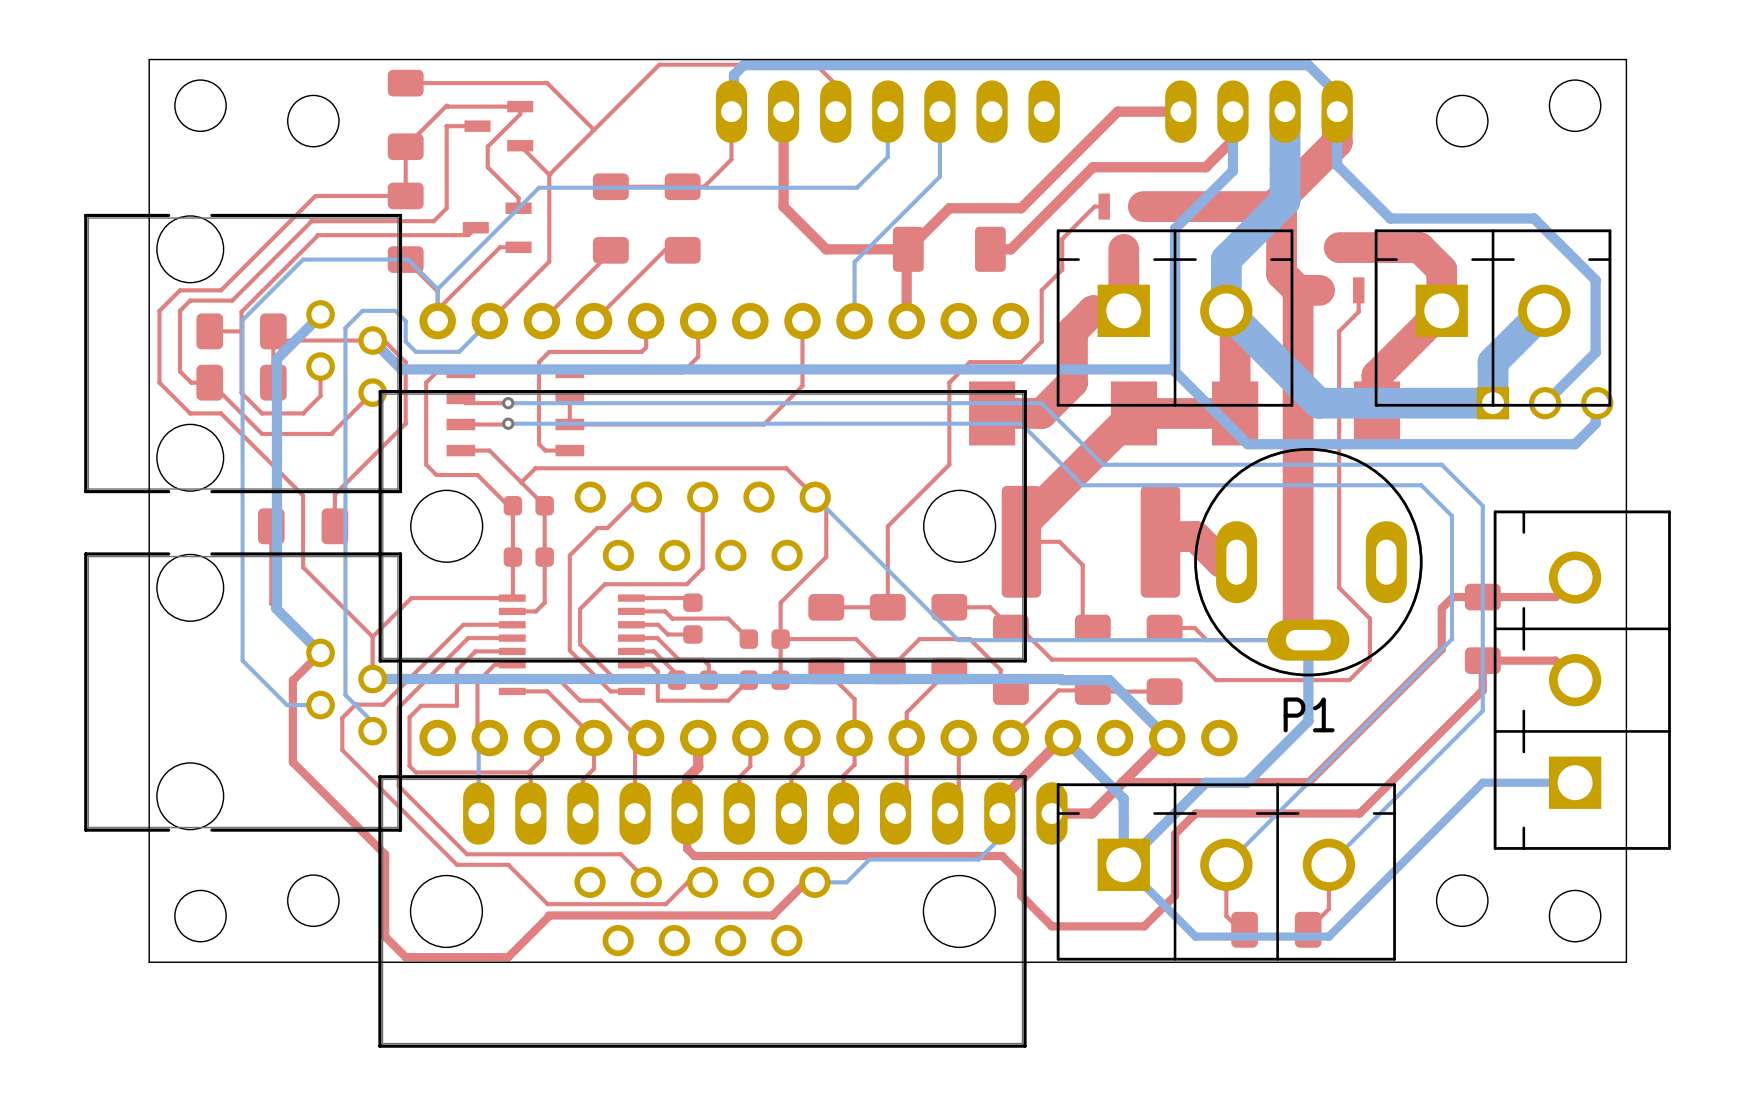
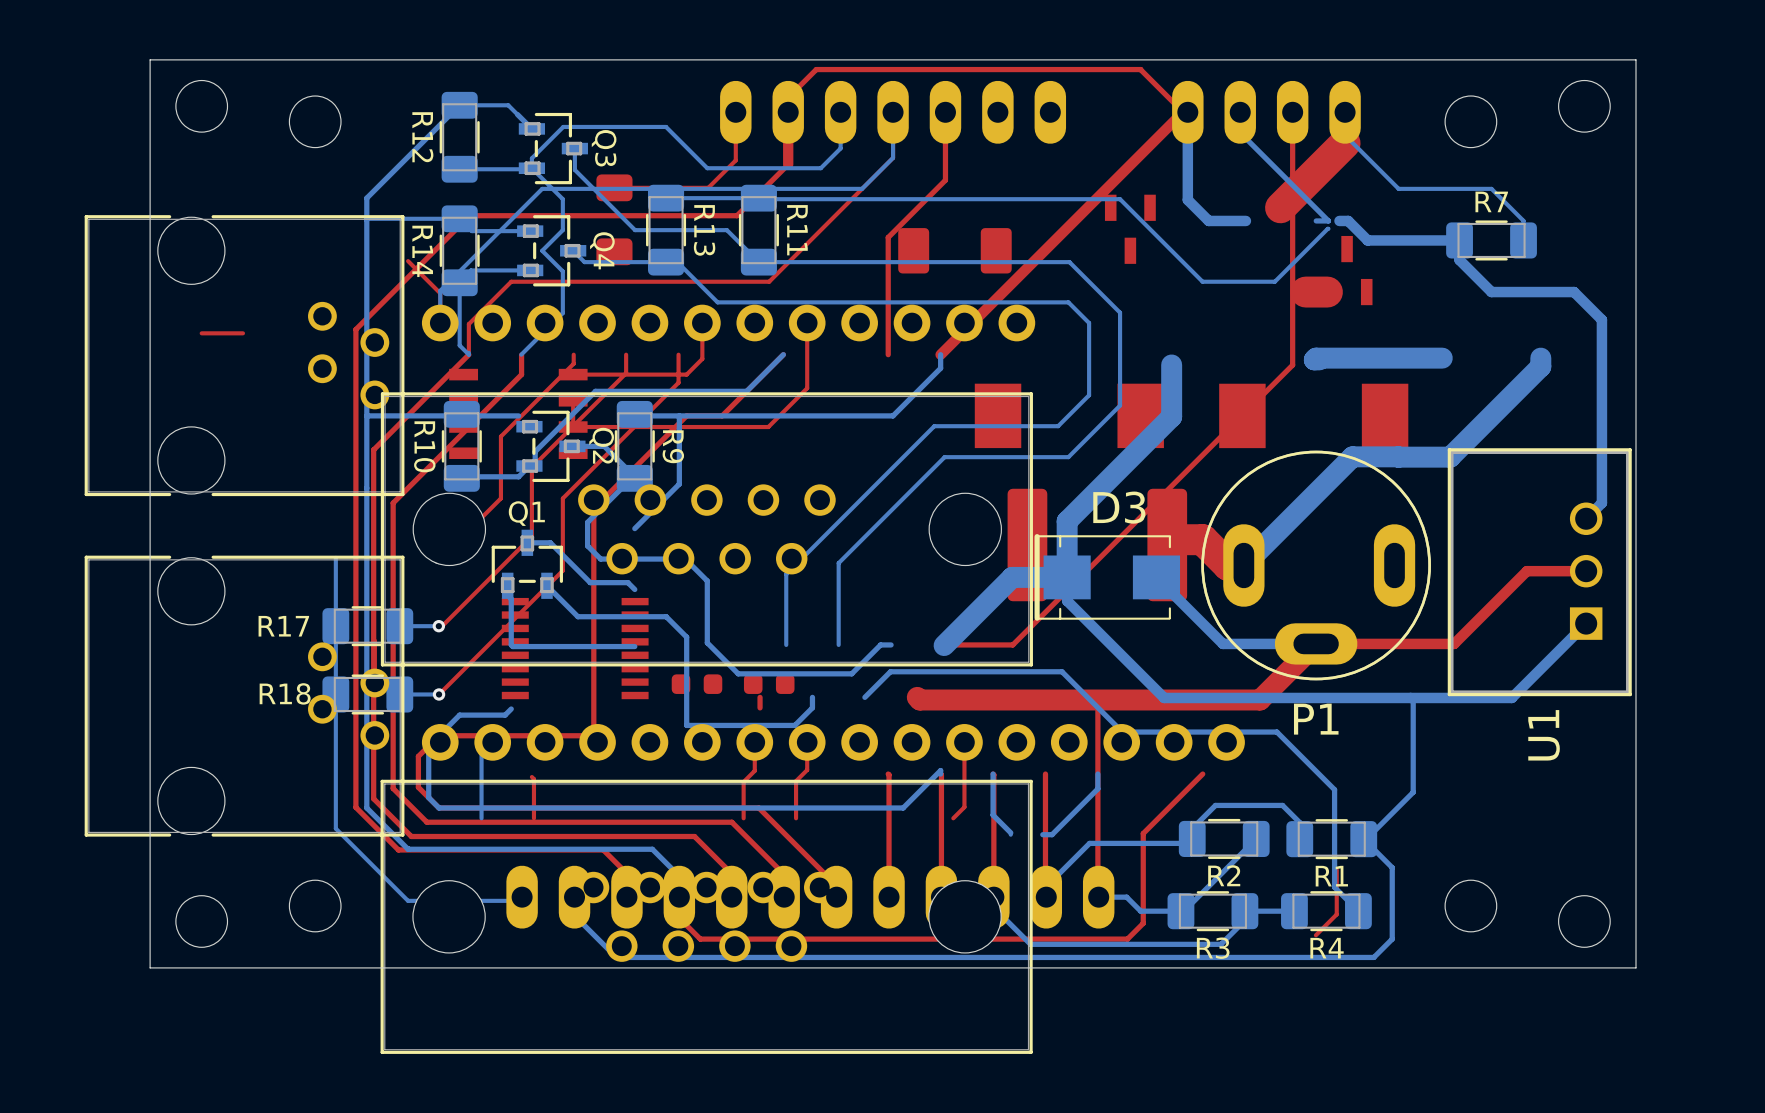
top track: none -> (1140, 69) (816, 69) (788, 97) (788, 112)
top track: none -> (1140, 69) (1183, 112)
top track: (403, 85) (405, 83) (547, 83) (594, 129) -> none
top track: (835, 111) (835, 84) (816, 64) (659, 64) (549, 174) -> none
bottom track: none -> (840, 112) (840, 148) (820, 168) (707, 168) (666, 126) (563, 126) (531, 158) (531, 168)
top track: none -> (893, 112) (893, 157) (769, 281) (511, 281) (468, 324) (468, 354) (373, 449) (373, 798) (411, 836) (694, 836) (731, 873)
top track: none -> (945, 112) (945, 180) (888, 237) (888, 354)
bottom track: (939, 111) (939, 176) (854, 262) (854, 321) -> none
top track: (1176, 111) (1117, 111) (1021, 208) (949, 208) (906, 250) (906, 321) -> (1183, 112) (940, 354)
bottom track: none -> (1187, 112) (1187, 199) (1208, 220) (1245, 220)
top track: (1232, 111) (1232, 140) (1205, 167) (1092, 167) (1010, 249) (990, 249) -> none
top track: none -> (1292, 112) (1292, 365) (1012, 644) (943, 644)
bottom track: (1285, 111) (1285, 200) (1226, 259) (1226, 310) (1318, 403) (1493, 403) (1493, 362) (1544, 310) -> none
bottom track: (1337, 111) (1337, 93) (1308, 65) (743, 65) (733, 74) (733, 109) (731, 111) -> none
R12 side: top (405, 114) -> bottom (459, 137)
top track: (477, 126) (446, 126) (446, 208) (433, 221) (310, 221) -> none
Q3 side: top (498, 126) -> bottom (553, 148)
bottom track: none -> (531, 128) (508, 105) (459, 105) (366, 198) (366, 807) (408, 849) (652, 849) (679, 876) (679, 897)
bottom track: (1232, 131) (1232, 170) (1175, 228) (1175, 371) (1247, 444) (1575, 444) (1595, 423) (1595, 404) (1597, 403) -> (1240, 132) (1328, 220) (1316, 220)
bottom track: (1337, 134) (1337, 165) (1390, 218) (1534, 218) (1595, 280) (1595, 352) (1545, 403) -> (1345, 135) (1398, 188) (1491, 188) (1523, 220) (1523, 240)
top track: (520, 145) (549, 174) -> none
bottom track: none -> (574, 148) (574, 169) (635, 230) (726, 230) (758, 262) (1069, 262) (1120, 312) (1120, 405) (1068, 457) (944, 457) (838, 563) (838, 644)
top track: (783, 163) (783, 206) (826, 249) (908, 249) -> (788, 164) (737, 215) (469, 215) (355, 329) (355, 807) (398, 849) (603, 849) (626, 873) (626, 897)
bottom track: none -> (531, 168) (562, 199) (562, 230) (542, 250) (562, 271) (562, 313) (521, 354)
bottom track: none -> (531, 168) (459, 169)
top track: (549, 174) (549, 261) (489, 321) -> none
bottom track: none -> (666, 198) (1120, 199) (1202, 281) (1274, 281) (1328, 228)
top track: (1104, 206) (1094, 206) (1062, 239) (1062, 269) (1041, 290) (1041, 341) (1021, 362) (969, 362) (949, 382) (949, 464) (887, 526) (887, 607) (826, 607) -> none
top track: (1143, 206) (1273, 206) (1281, 215) (1281, 273) (1298, 290) (1298, 629) (1308, 640) (1206, 640) (1194, 628) (1164, 628) -> none
top track: (518, 208) (518, 198) (487, 167) (487, 146) (520, 114) (520, 106) (446, 105) (405, 146) (405, 195) (315, 195) (221, 290) (180, 290) (159, 310) (159, 382) (190, 413) (221, 413) (303, 495) (303, 567) (372, 636) (411, 598) (512, 597) (512, 505) (508, 505) (477, 474) (436, 474) (426, 464) (426, 382) (436, 372) (460, 372) -> none
bottom track: none -> (366, 219) (459, 218) (472, 231) (530, 231)
part: (682, 218) -> none
bottom track: none -> (1339, 220) (1348, 220) (1367, 240) (1459, 240) (1459, 260) (1491, 292) (1574, 292) (1601, 319) (1601, 503) (1586, 518)
top track: (311, 221) (232, 300) (190, 300) (180, 310) (180, 371) (191, 382) (210, 382) (262, 433) (332, 433) -> none
R14 side: top (405, 227) -> bottom (459, 250)
top track: (475, 227) (468, 235) (317, 235) -> none
Q4 side: top (497, 227) -> bottom (551, 250)
R11: none -> (758, 230)
top track: (318, 235) (241, 311) (241, 392) (262, 413) (304, 413) -> none
R7: none -> (1491, 240)
top track: (518, 247) (500, 247) (437, 309) -> none
top track: (1339, 247) (1419, 247) (1441, 269) (1441, 310) (1376, 375) (1376, 413) -> none
top track: (1123, 249) (1123, 310) (1092, 310) (1072, 331) (1072, 382) (1041, 413) (992, 413) -> none
top track: (610, 250) (541, 321) -> none
top track: (682, 250) (664, 250) (594, 321) -> none
bottom track: none -> (530, 270) (470, 270) (459, 281) (459, 345) (468, 354) (468, 352)
bottom track: (437, 289) (408, 259) (303, 259) (242, 320) (242, 660) (286, 705) (320, 705) -> none
top track: (1358, 290) (1358, 311) (1339, 331) (1339, 587) (1369, 618) (1369, 659) (1349, 680) (1216, 680) (1195, 659) (1051, 659) (1020, 628) (1010, 628) (990, 607) (949, 607) -> none
top track: (1226, 310) (1235, 319) (1235, 413) (1134, 413) (1021, 526) (1021, 541) (1059, 541) (1082, 565) (1082, 617) (1092, 628) -> none
bottom track: (321, 314) (276, 359) (276, 608) -> none
part: (1175, 318) -> none
part: (1493, 318) -> none
bottom track: (489, 321) (459, 351) (415, 351) (405, 341) (405, 321) (395, 310) (362, 310) (345, 327) (345, 694) (372, 722) (372, 731) -> none
top track: (646, 321) (646, 347) (641, 351) (549, 351) (539, 362) (539, 444) (545, 450) (569, 450) -> none
R13 side: top (241, 331) -> bottom (666, 230)
bottom track: (372, 340) (401, 369) (1175, 369) -> none
top track: none -> (521, 354) (521, 374) (393, 503) (393, 788) (426, 822) (731, 822) (784, 874)
top track: none -> (573, 354) (573, 363) (511, 426)
top track: none -> (626, 354) (626, 373) (531, 467) (531, 536) (441, 627) (438, 627)
top track: none -> (783, 354) (722, 415) (686, 415) (593, 508) (593, 735) (439, 735) (418, 756) (418, 787) (439, 807) (758, 807) (836, 885) (836, 897)
bottom track: none -> (783, 354) (746, 391) (595, 391) (535, 451) (535, 460) (518, 476) (461, 478)
bottom track: none -> (940, 354) (940, 368) (893, 415) (634, 415)
bottom track: none -> (1442, 358) (1316, 358) (1314, 359) (1319, 359)
bottom track: none -> (1540, 358) (1540, 366) (1450, 457) (1352, 456) (1243, 565)
bottom track: none -> (1171, 364) (1171, 416) (1067, 521) (1067, 577)
top track: (320, 366) (320, 396) (303, 413) -> none
part: (241, 382) -> none
top track: (273, 382) (273, 331) (282, 340) (384, 340) (405, 362) (405, 423) (334, 494) (334, 526) -> none
top track: (372, 392) (331, 433) -> none
top track: (460, 398) (465, 403) (508, 403) -> none
bottom track: (508, 403) (1041, 403) (1103, 464) (1441, 464) (1482, 505) (1482, 710) (1328, 864) -> none
via: (508, 403) -> none
part side: top (1545, 403) -> bottom (1539, 572)
bottom track: none -> (518, 415) (366, 415)
bottom track: none -> (679, 415) (679, 484) (634, 528)
via: (508, 423) -> none
bottom track: (928, 423) (508, 423) -> (934, 426) (786, 574) (786, 644)
bottom track: (1021, 423) (1082, 485) (1421, 485) (1452, 516) (1452, 639) (1226, 864) -> (1027, 426) (1058, 426) (1089, 395) (1089, 323) (1068, 302) (717, 302) (677, 262) (584, 262) (573, 250)
top track: (507, 424) (460, 424) -> (510, 427) (500, 436) (500, 498) (441, 557) (438, 557)
R10: none -> (461, 446)
Q2: none -> (550, 446)
bottom track: none -> (572, 446) (604, 446) (634, 476) (587, 522) (587, 545) (600, 559) (685, 559) (707, 580) (707, 642) (738, 673) (851, 673) (880, 644) (891, 644)
R9: none -> (634, 446)
top track: (460, 450) (489, 450) (544, 505) (544, 602) (535, 611) (512, 611) -> none
top track: (521, 482) (535, 468) (786, 468) (826, 508) (826, 557) (780, 602) (780, 680) -> none
top track: (646, 497) (638, 497) (607, 528) (597, 528) (569, 555) (569, 650) (610, 691) (631, 691) -> none
top track: (702, 497) (702, 568) (686, 584) (604, 584) (580, 609) (580, 644) (613, 678) (631, 678) -> none
bottom track: (815, 497) (958, 640) (1215, 640) -> (1156, 577) (1222, 643)
part: (528, 505) -> none
top track: (271, 526) (271, 603) (320, 652) (292, 680) (292, 762) (385, 854) (385, 936) (405, 957) (508, 957) (548, 915) (772, 915) (806, 882) (814, 882) -> none
part: (303, 526) -> none
bottom track: none -> (527, 542) (550, 542) (590, 582) (627, 582) (634, 589)
bottom track: none -> (335, 557) (335, 828) (408, 900) (518, 900) (522, 897)
part: (528, 557) -> none
Q1: none -> (527, 564)
top track: none -> (1586, 571) (1526, 571) (1454, 643) (1316, 643) (1260, 699) (919, 699) (917, 697)
bottom track: none -> (1067, 577) (1067, 600) (1164, 697) (1511, 697) (1586, 623)
bottom track: none -> (1067, 577) (1012, 577) (943, 644)
D3: none -> (1107, 577)
top track: (1575, 577) (1555, 597) (1453, 597) (1441, 608) (1441, 649) (1309, 782) (1123, 782) -> none
bottom track: none -> (507, 585) (507, 595) (511, 599) (512, 646) (634, 646)
bottom track: none -> (546, 585) (577, 616) (666, 616) (686, 637) (686, 725) (794, 725) (812, 707) (812, 697)
top track: (631, 598) (688, 598) (692, 602) -> none
bottom track: (275, 608) (320, 652) -> none
top track: (631, 611) (665, 611) (672, 618) (728, 618) (748, 639) -> none
part: (692, 618) -> none
R17: none -> (367, 626)
bottom track: none -> (438, 626) (399, 626)
via: none -> (438, 626)
top track: (512, 624) (463, 624) (383, 704) (356, 704) (342, 717) (342, 750) (456, 864) (508, 864) (547, 904) (665, 904) (687, 882) (702, 882) -> none
top track: (631, 624) (658, 624) (667, 634) (692, 634) -> none
part: (1482, 628) -> none
top track: (512, 638) (468, 638) (398, 707) (398, 785) (466, 854) (620, 854) (641, 875) (646, 875) -> none
top track: (631, 638) (657, 638) (678, 659) (703, 659) (708, 665) (708, 680) -> none
part: (764, 639) -> none
top track: (780, 639) (856, 639) (887, 670) (919, 639) (969, 639) (1000, 669) (1000, 681) (1010, 691) -> none
part: (826, 639) -> none
part: (887, 639) -> none
part: (949, 639) -> none
bottom track: (1308, 640) (1308, 721) (1246, 782) (1205, 782) (1123, 864) -> none
bottom track width: thin (1308, 640) (1215, 640) -> thick (1316, 643) (1222, 643)
top track: (512, 651) (475, 651) -> (678, 354) (678, 382) (562, 498) (562, 570) (478, 655)
top track: (631, 651) (653, 651) (677, 674) (677, 680) -> none
part: (1010, 659) -> none
R1 side: top (1092, 659) -> bottom (1331, 839)
R2 side: top (1164, 659) -> bottom (1224, 838)
top track: (512, 664) (494, 664) (477, 682) (477, 725) (489, 738) -> none
top track: (631, 664) (650, 664) (657, 671) (657, 700) (728, 700) (748, 680) -> none
top track: (456, 669) (456, 705) (421, 705) (409, 717) (409, 766) (415, 772) (528, 772) (541, 759) (541, 738) -> (459, 673) (439, 694)
top track: (826, 670) (854, 699) (854, 764) (843, 775) (843, 813) -> none
top track: (949, 670) (906, 712) (906, 802) (895, 813) -> none
top track: (512, 678) (557, 678) (580, 700) (600, 700) (637, 738) (646, 738) (635, 749) (635, 813) -> none
bottom track: (372, 679) (1109, 680) (1167, 738) -> none
top track: (1575, 680) (1555, 660) (1482, 660) (1482, 690) (1359, 813) (1195, 813) (1175, 834) (1175, 895) (1144, 926) (1051, 926) (1021, 895) (1021, 875) (1002, 856) (694, 856) (687, 848) (687, 778) (698, 767) (698, 738) -> none
part: (1582, 680) -> none
R18: none -> (367, 694)
bottom track: none -> (439, 694) (399, 694)
via: none -> (439, 694)
top track: (512, 691) (547, 691) (594, 738) (594, 768) (582, 779) (582, 813) -> none
top track: (1164, 691) (1058, 690) (1010, 738) -> none
top track: none -> (760, 697) (760, 707)
bottom track: none -> (864, 697) (890, 671) (1062, 671) (1122, 732) (1276, 732) (1334, 789) (1334, 887) (1358, 911)
bottom track: none -> (1410, 697) (1413, 700) (1413, 792) (1366, 839) (1363, 839) (1392, 867) (1392, 939) (1373, 957) (616, 957) (574, 915) (574, 897)
top track: none -> (1097, 699) (1098, 897)
bottom track: none -> (511, 708) (505, 715) (459, 715) (428, 746) (428, 797) (439, 807) (903, 807) (940, 770) (940, 774)
top track: (1063, 738) (999, 801) (999, 813) -> none
bottom track: (1063, 738) (1123, 798) (1123, 864) -> none
top track: (1167, 738) (1091, 813) (1051, 813) -> none
top track: none -> (888, 774) (889, 897)
top track: none -> (940, 774) (941, 897)
top track: none -> (993, 774) (993, 897)
bottom track: none -> (993, 774) (993, 815) (1010, 834)
top track: none -> (1045, 774) (1046, 897)
bottom track: none -> (1097, 774) (1097, 788) (1052, 834) (1042, 834)
top track: none -> (1202, 774) (1143, 833) (1143, 923) (1127, 939) (700, 939) (679, 918) (679, 897)
bottom track: (1575, 782) (1482, 782) (1328, 936) (1195, 936) (1123, 864) -> none
part position: (765, 813) -> (810, 897)
bottom track: (999, 813) (999, 838) (978, 859) (869, 859) (846, 882) (814, 882) -> none
bottom track: none -> (1256, 838) (1183, 911) (1140, 911) (1126, 897) (1098, 897)
bottom track: none -> (1301, 845) (1299, 822) (1282, 805) (1215, 805) (1192, 828) (1192, 845) (1190, 843) (1089, 843) (1046, 886) (1046, 897)
top track: (1226, 864) (1226, 916) (1240, 929) (1244, 929) -> none
part: (1226, 871) -> none
bottom track: none -> (993, 897) (993, 907) (1030, 944) (1221, 944) (1244, 920) (1244, 911) (1294, 911)
R3: none -> (1212, 911)
R4: none -> (1326, 911)
part: (1276, 929) -> none

